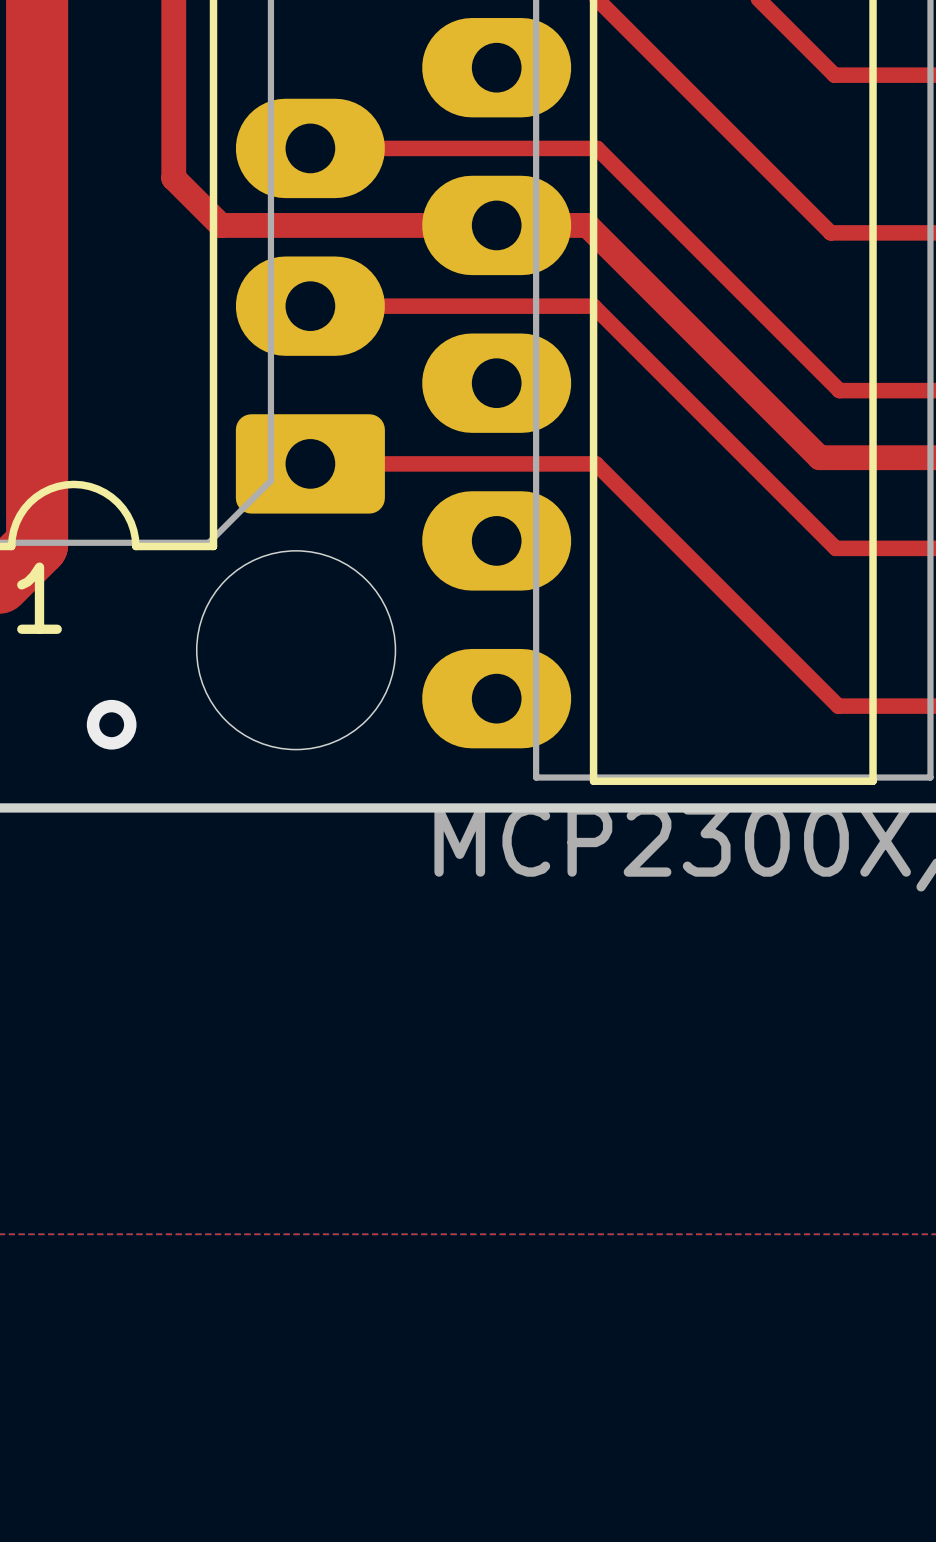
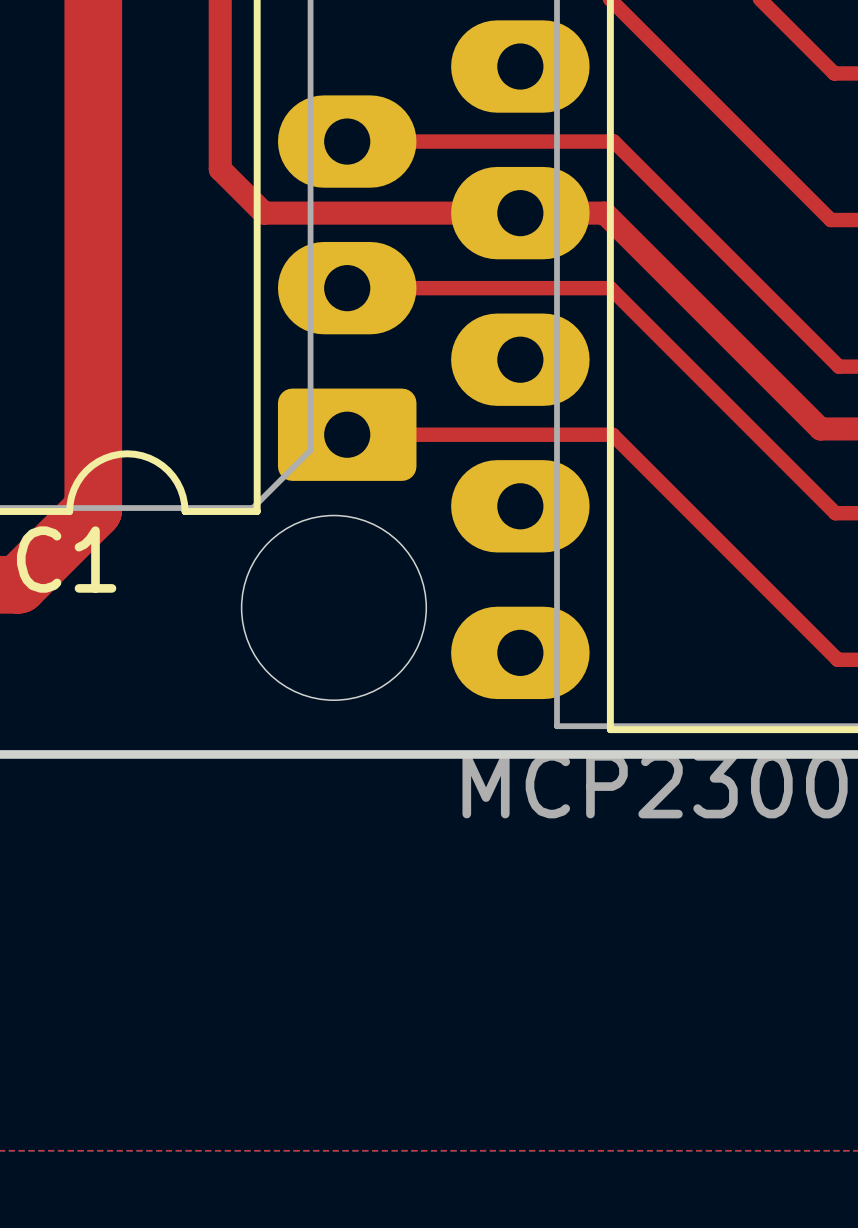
via: (111, 724) -> none

